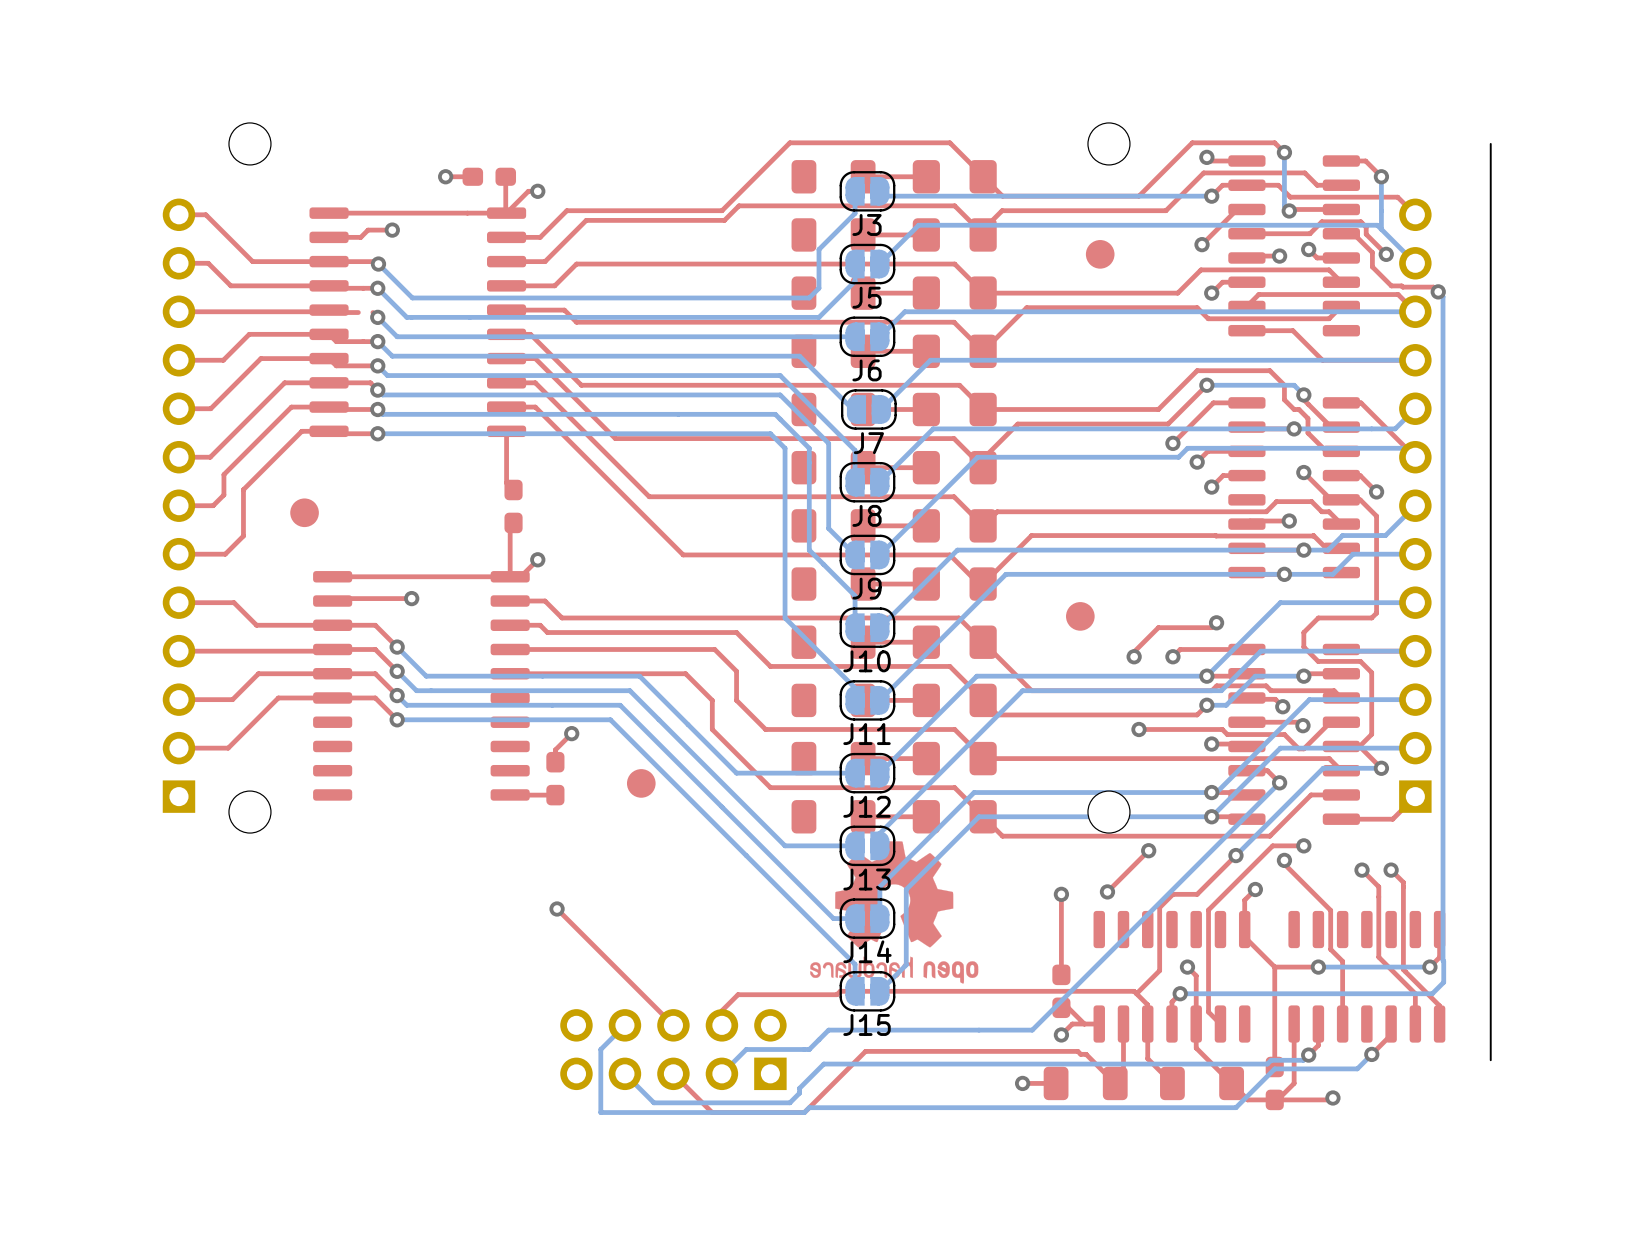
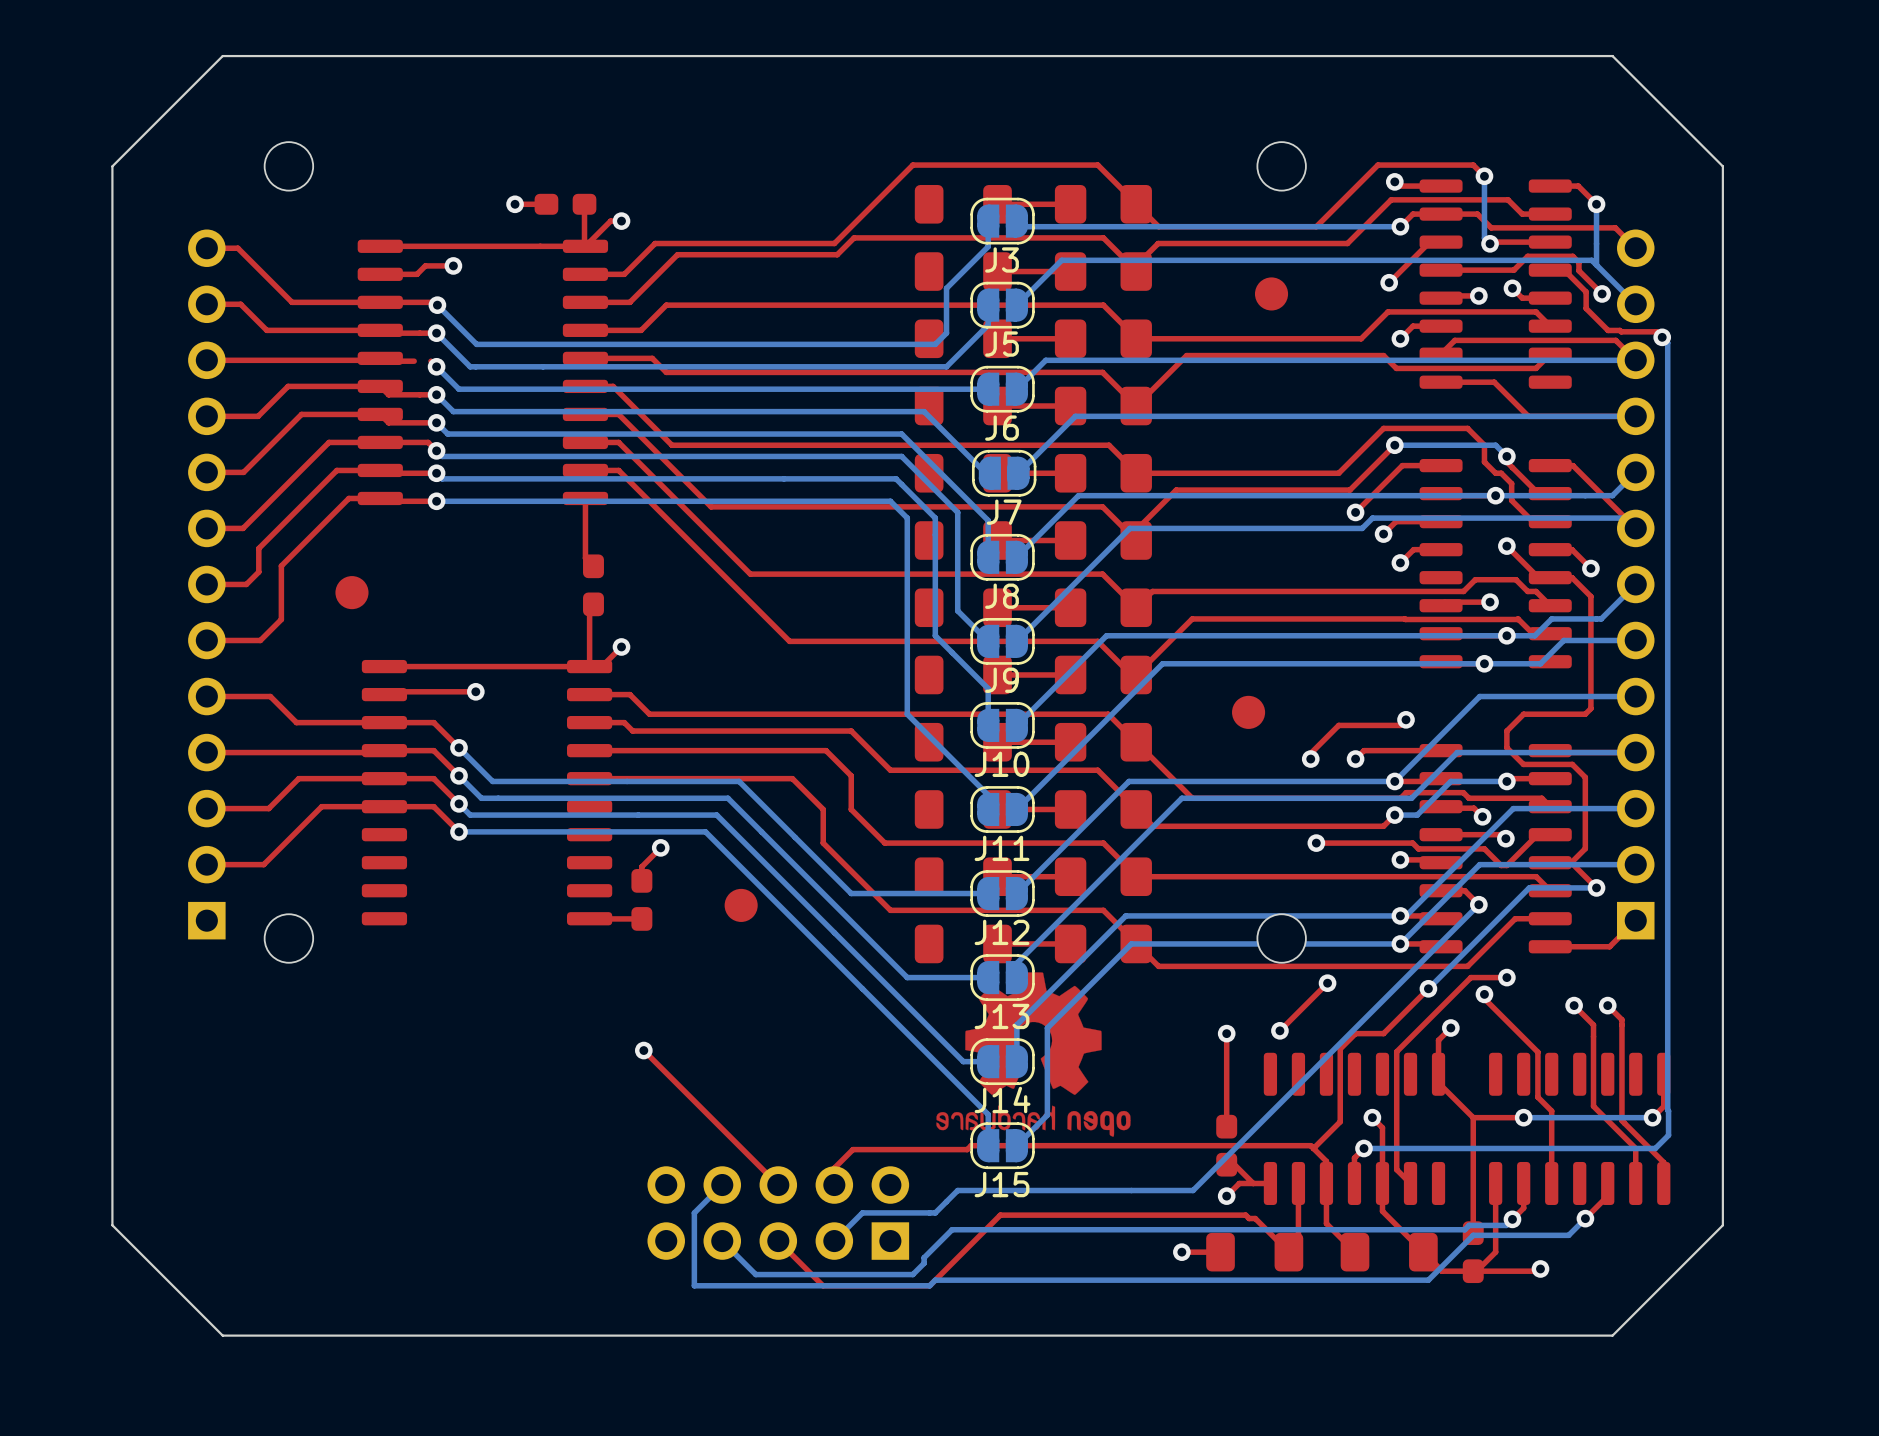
board edge: none -> (1722, 166) (1612, 56) (222, 56) (112, 166) (112, 1225) (222, 1335) (1612, 1335) (1722, 1225)

